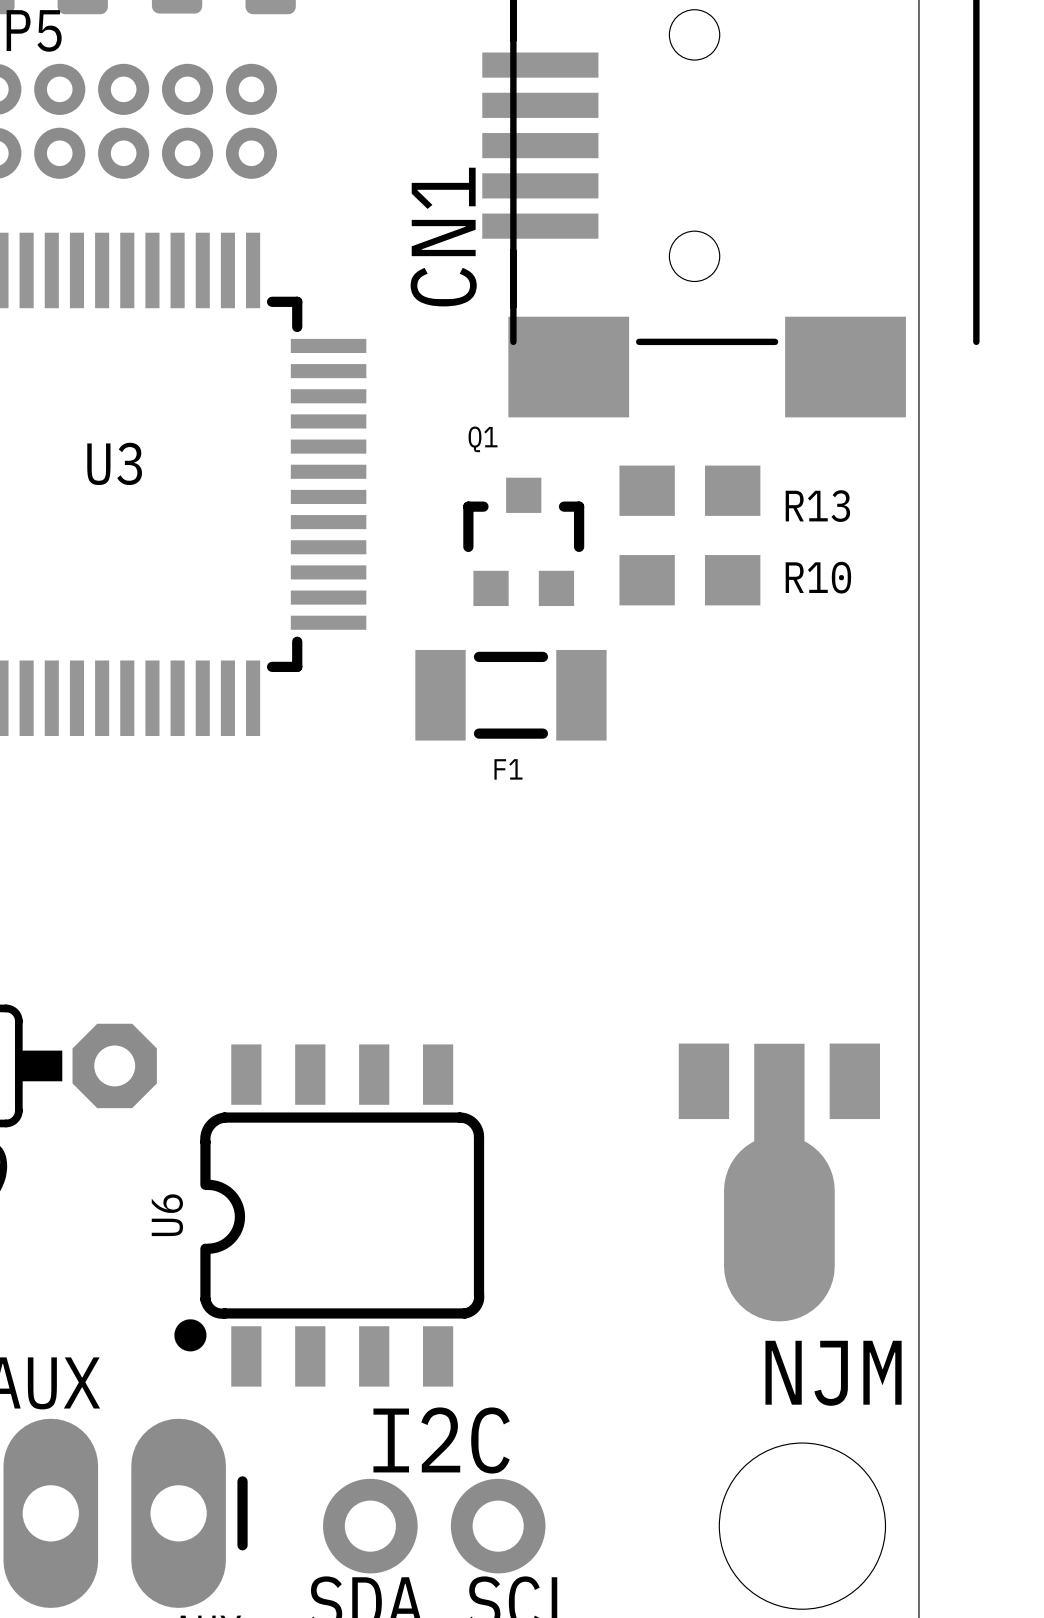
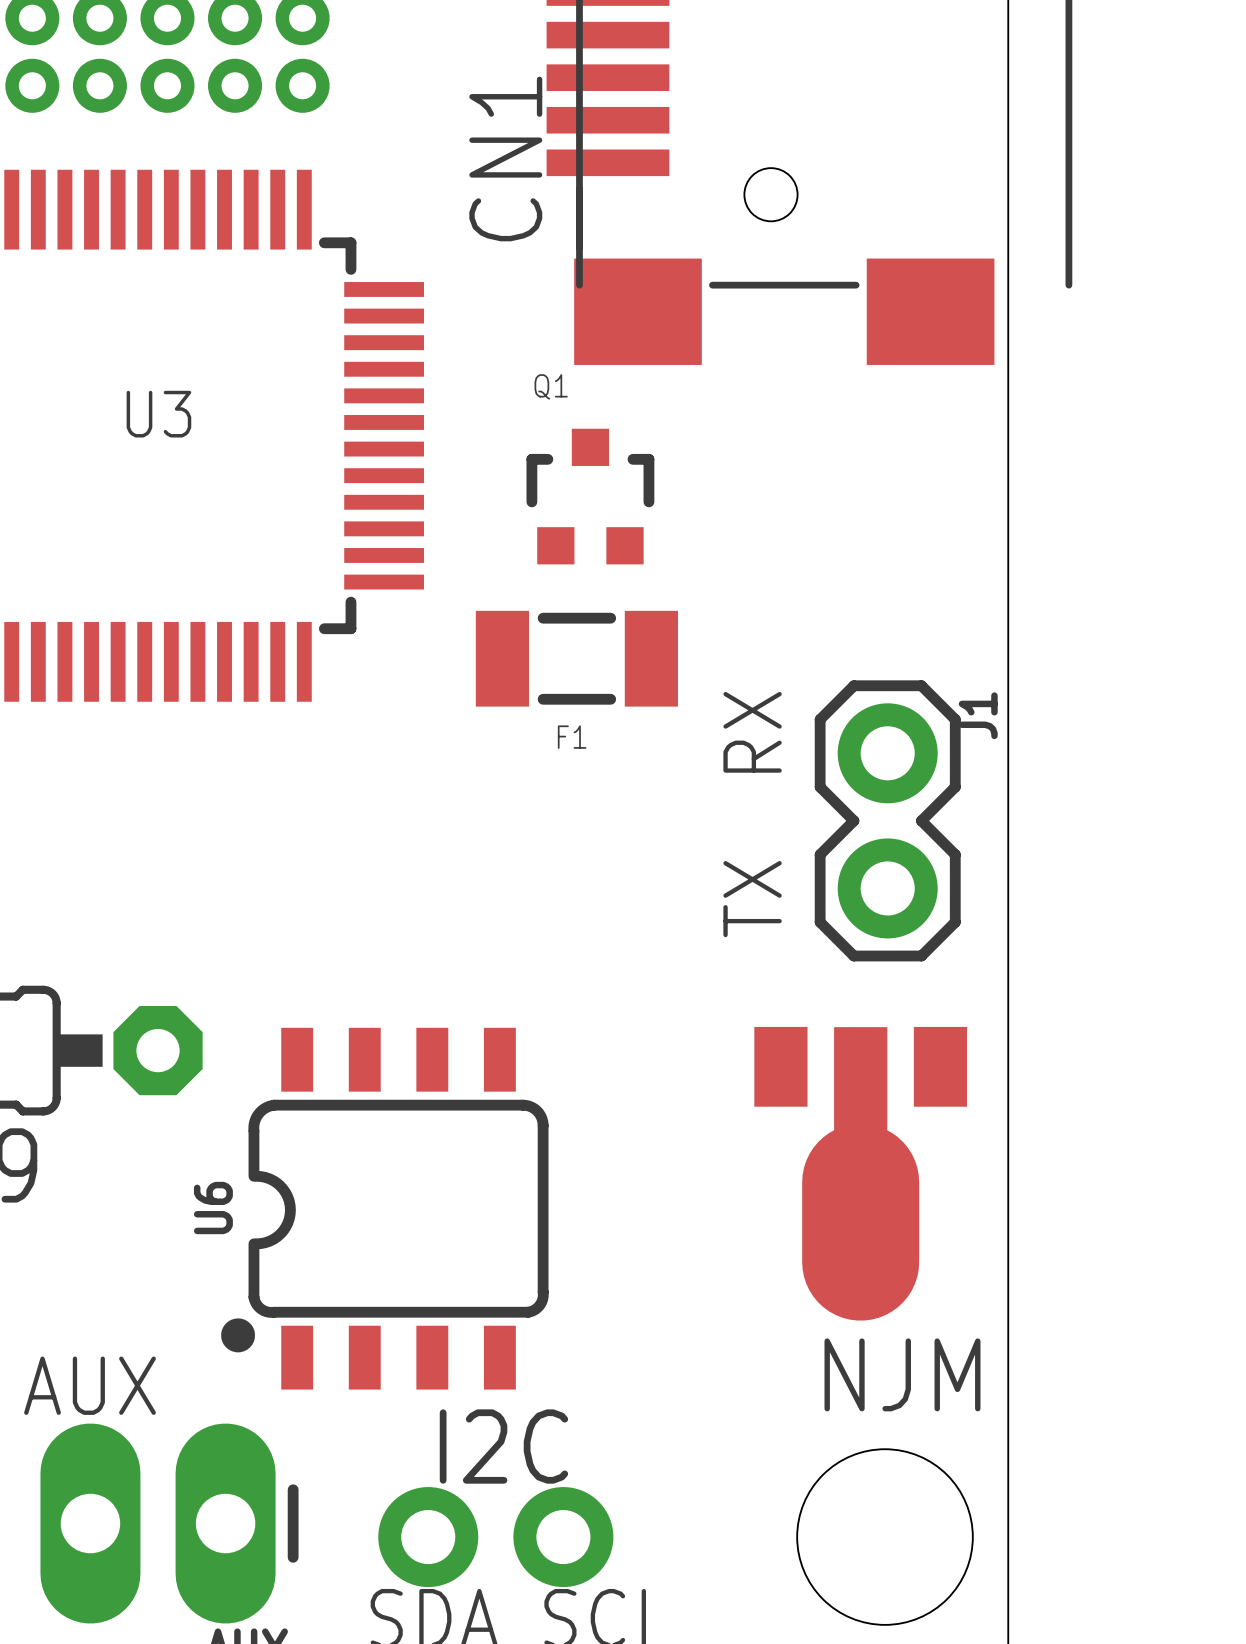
R13: (689, 490) -> none
R10: (689, 580) -> none
text: none -> TX RX (752, 814)
J1: none -> (887, 820)

